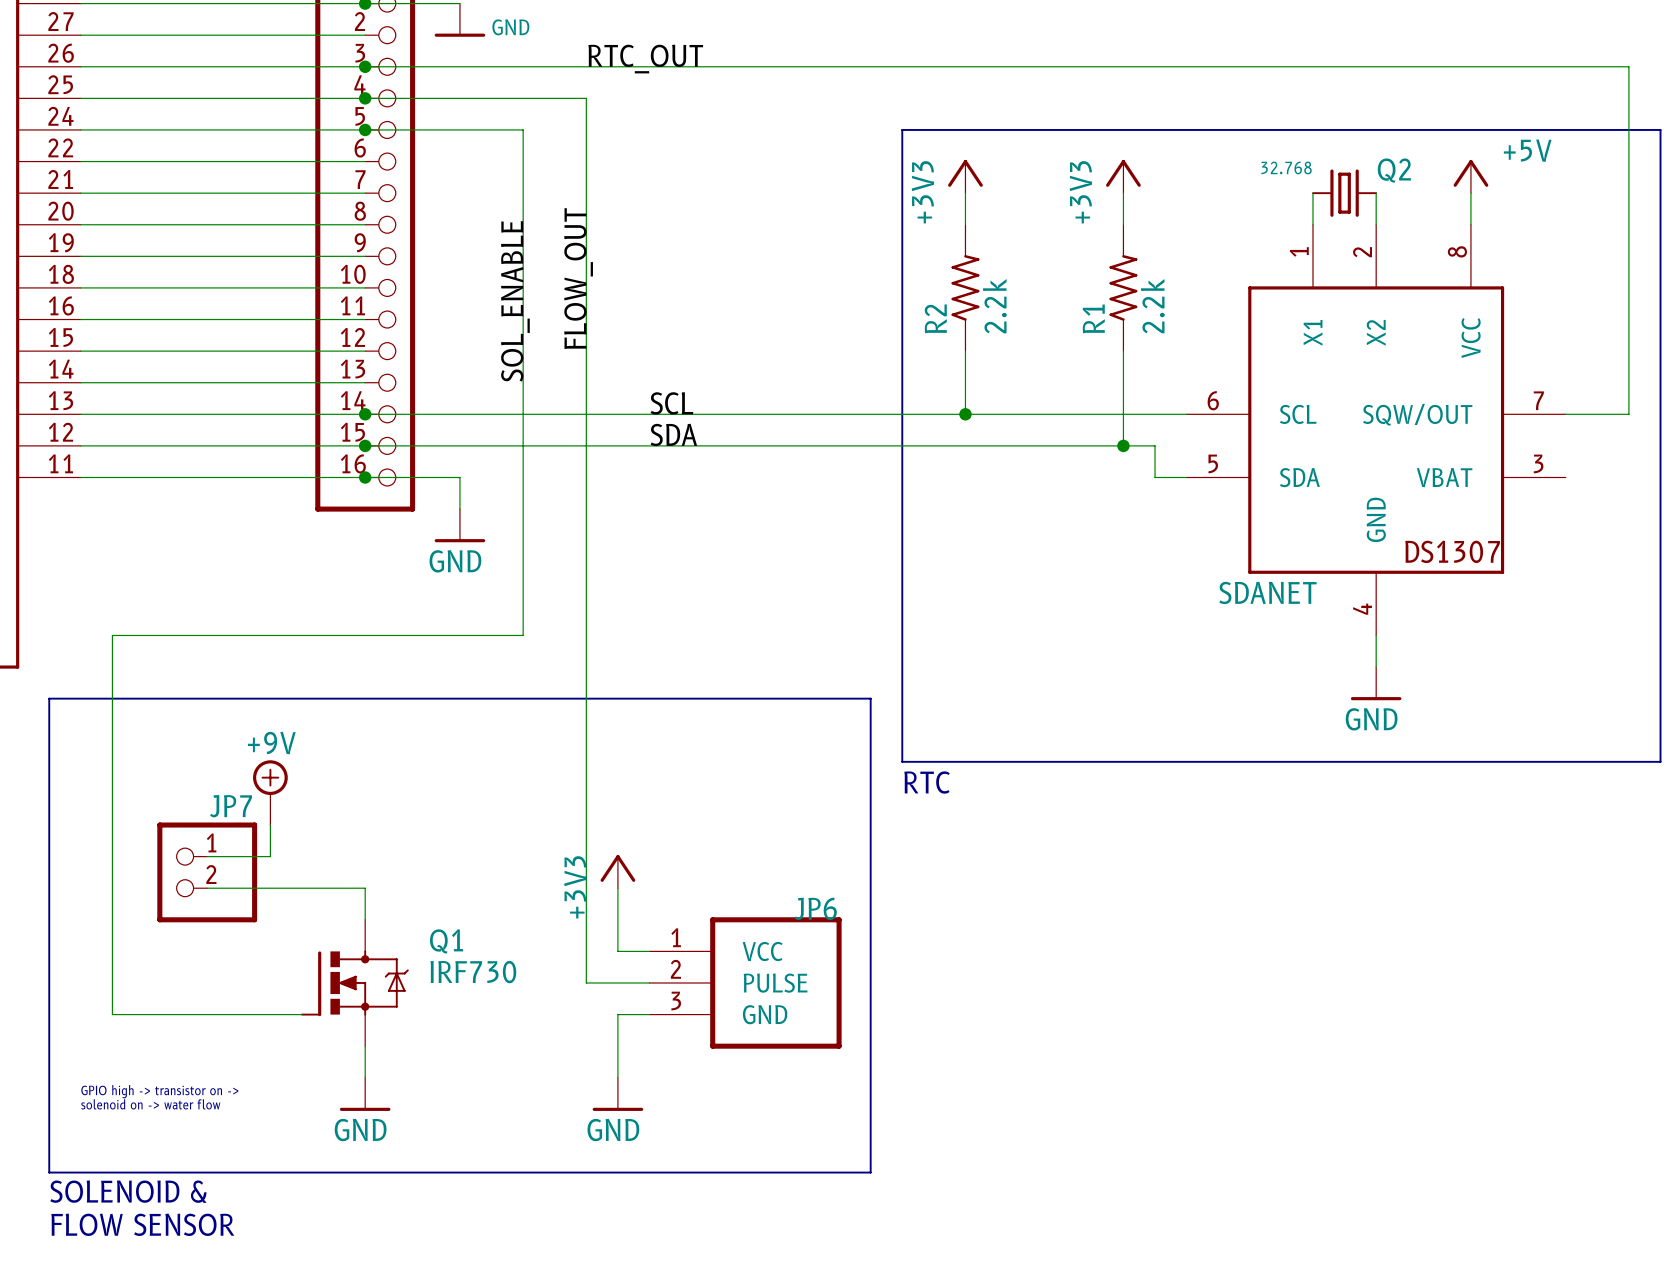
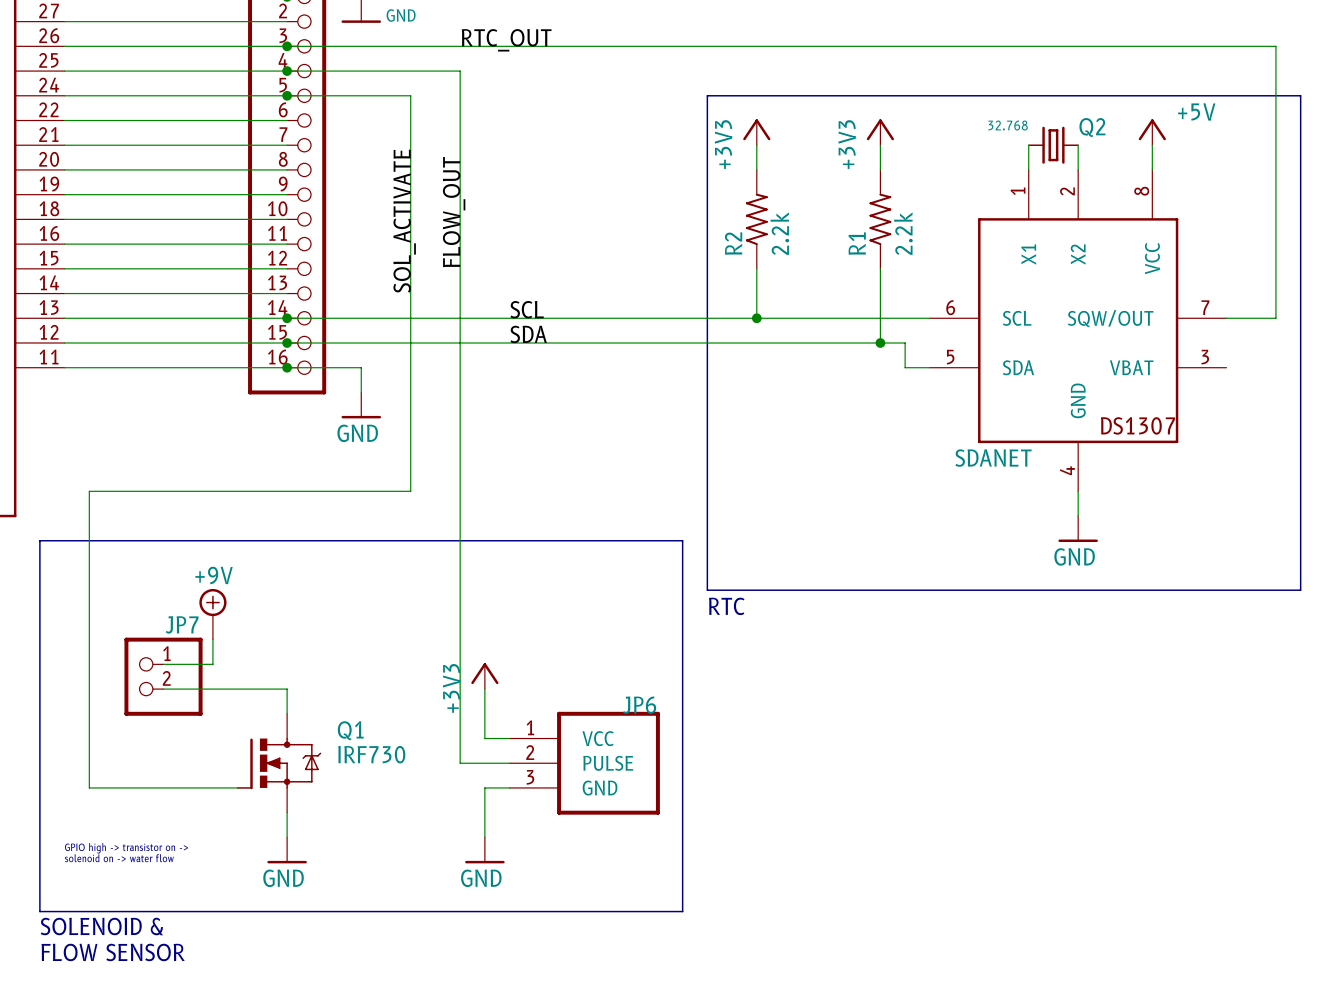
label: SOL_ENABLE (515, 301) -> SOL_ACTIVATE (404, 221)

